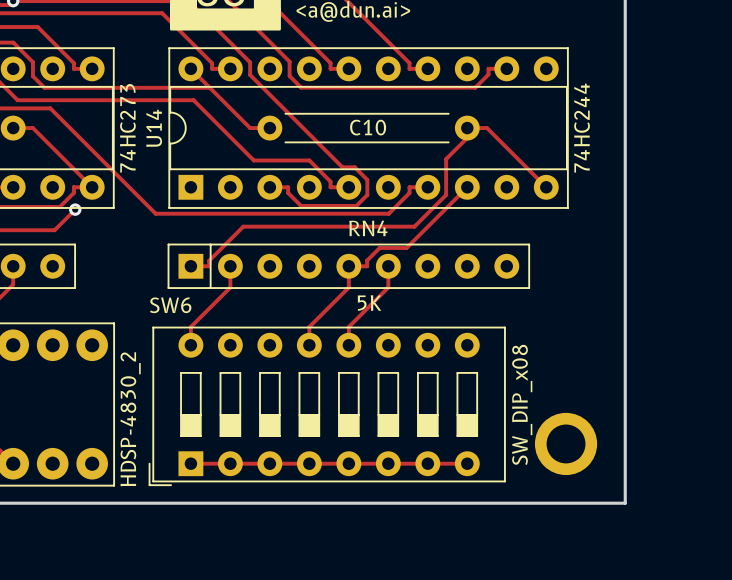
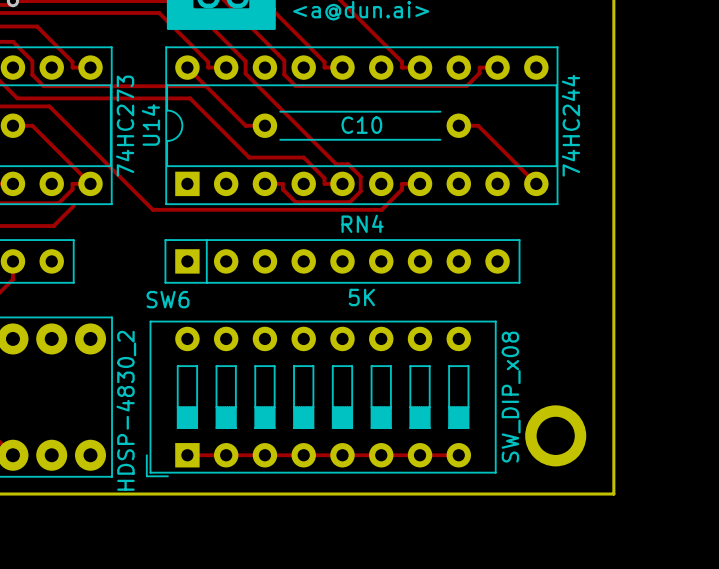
track: (477, 128) (446, 159) (446, 195) (414, 226) (243, 226) (209, 260) (209, 266) (190, 266) -> none
track: (467, 187) (406, 247) (379, 247) (367, 260) (367, 266) (348, 266) (348, 287) (309, 326) (309, 345) -> none
via: (75, 209) -> none
track: (230, 266) (230, 287) (190, 326) (190, 345) -> none
track: (388, 266) (388, 287) (348, 326) (348, 345) -> none

